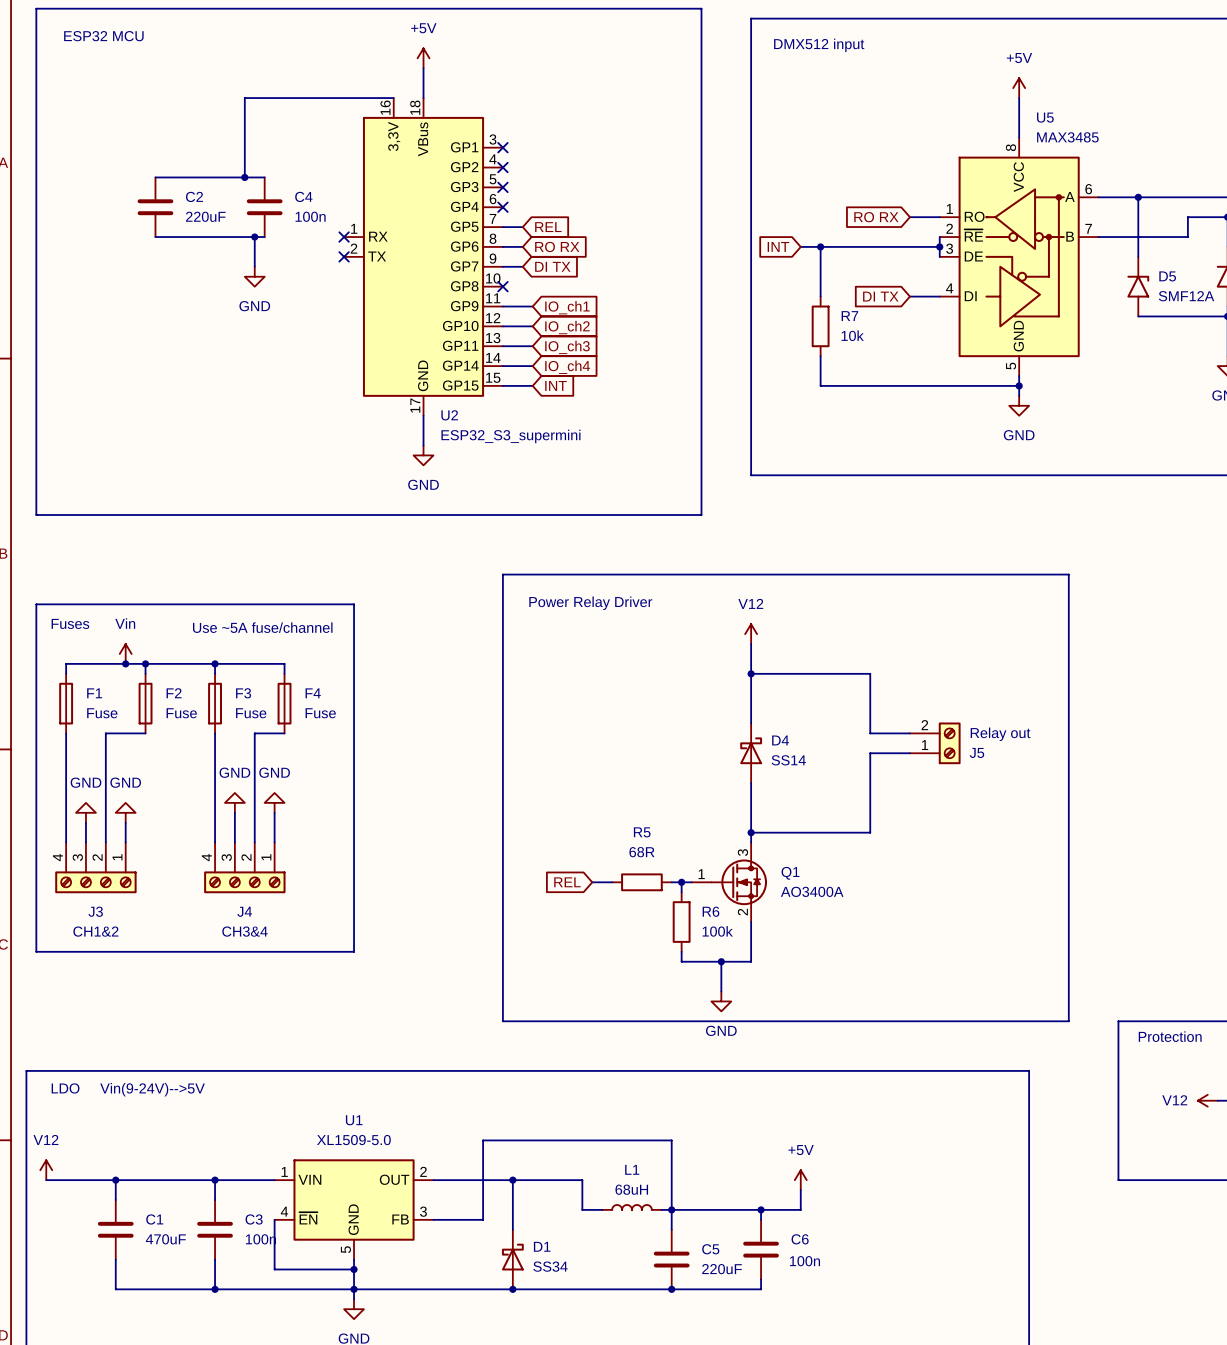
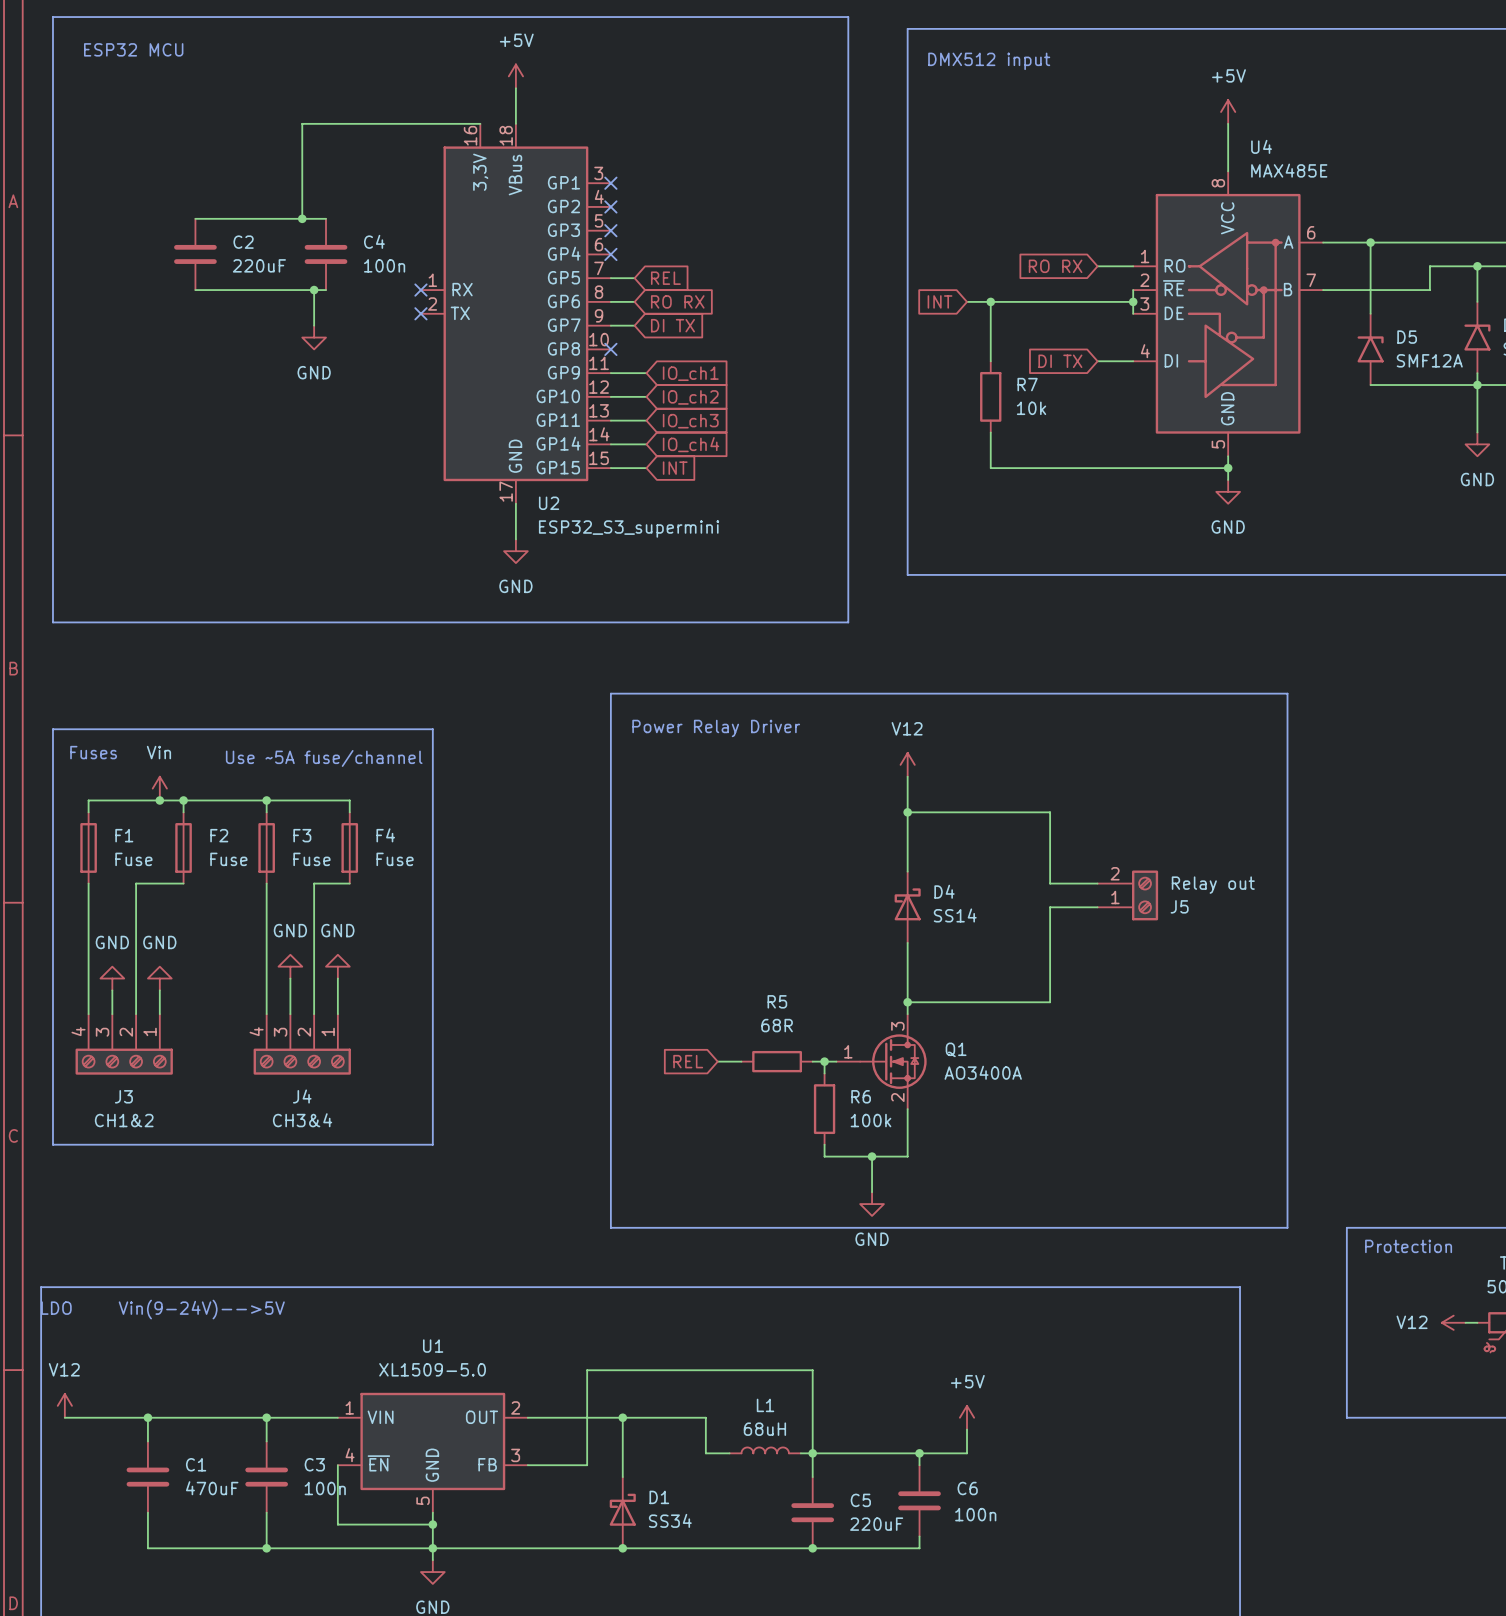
U5 name: U5 (1045, 117) -> U4 (1261, 146)
U5 value: MAX3485 (1067, 137) -> MAX485E (1289, 170)

